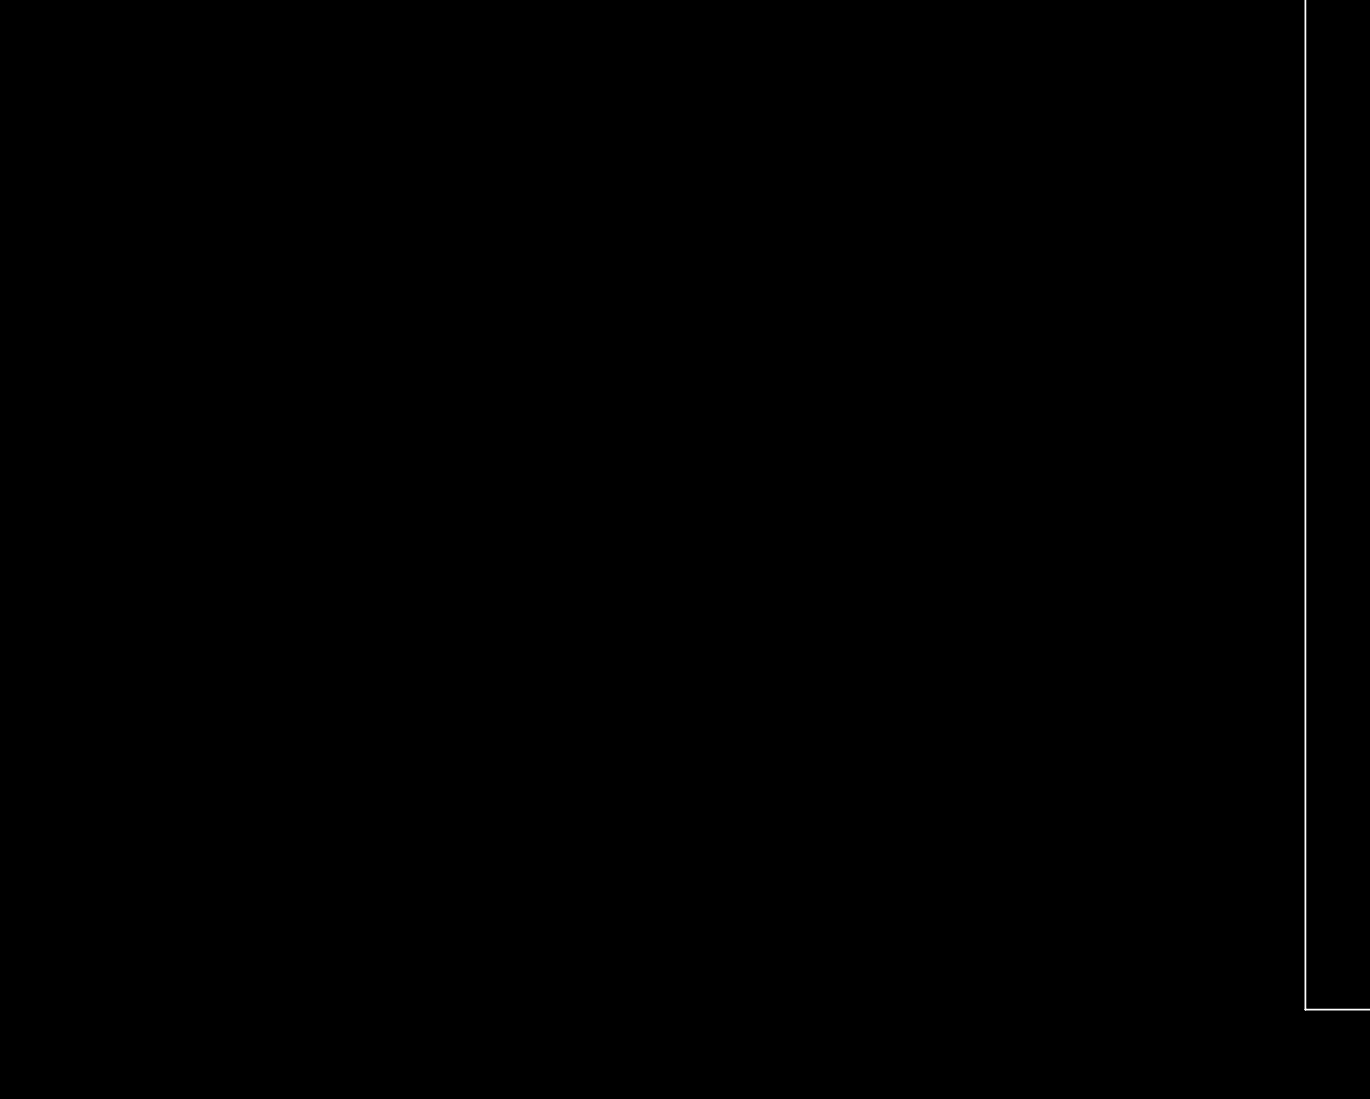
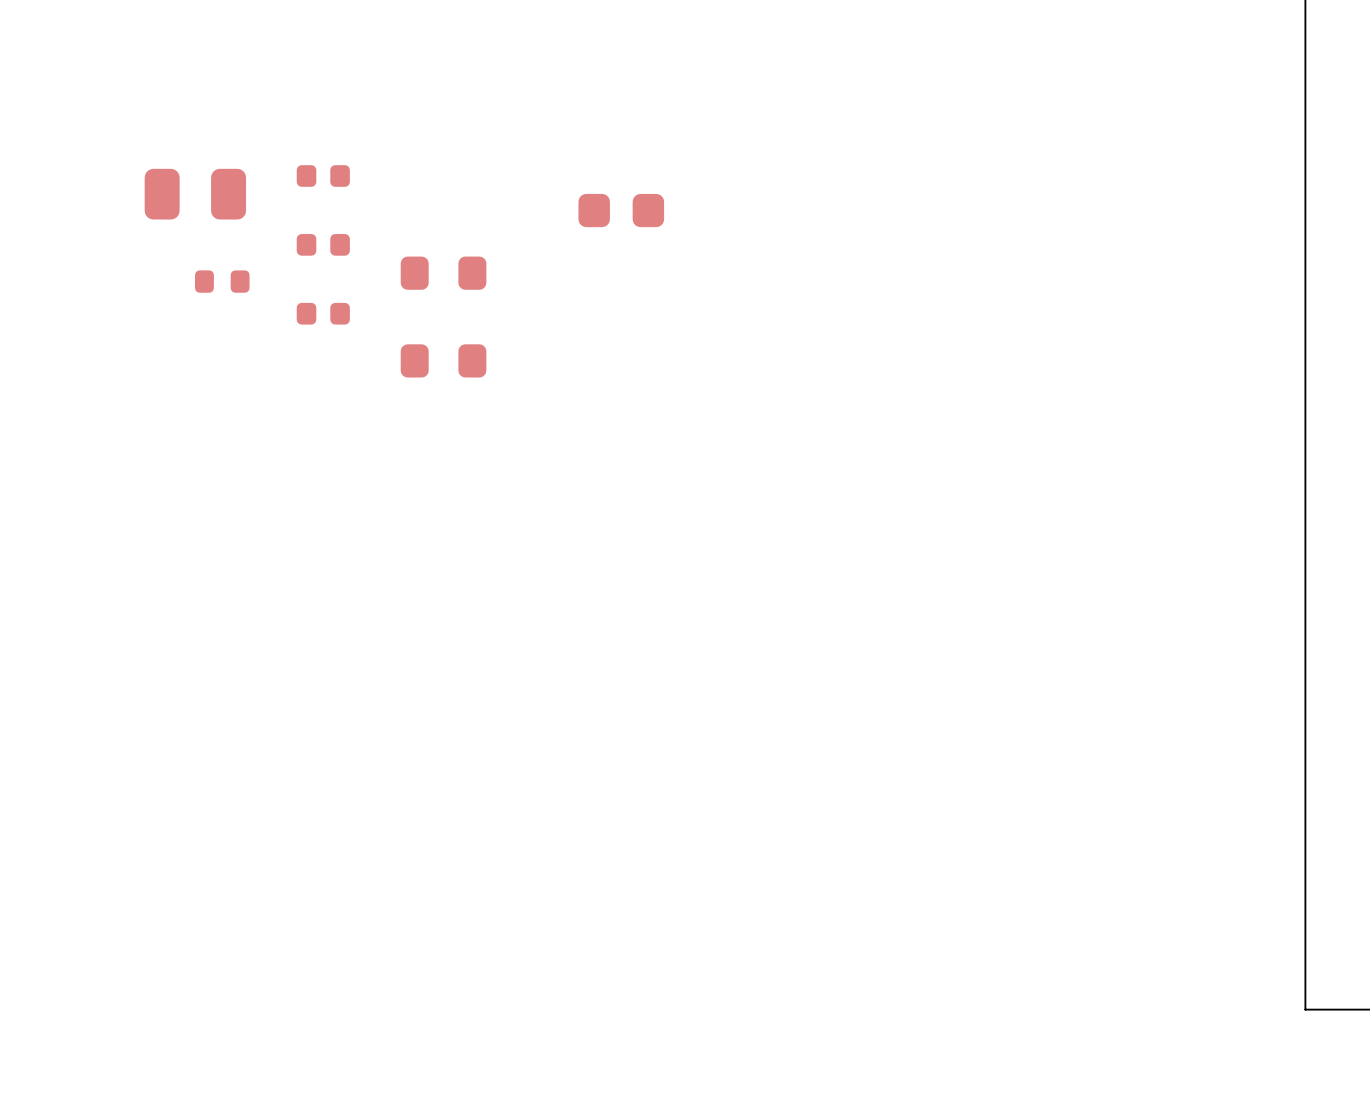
part: none -> (323, 176)
part: none -> (195, 194)
part: none -> (621, 210)
part: none -> (323, 244)
part: none -> (443, 273)
part: none -> (222, 281)
part: none -> (323, 313)
part: none -> (443, 360)

